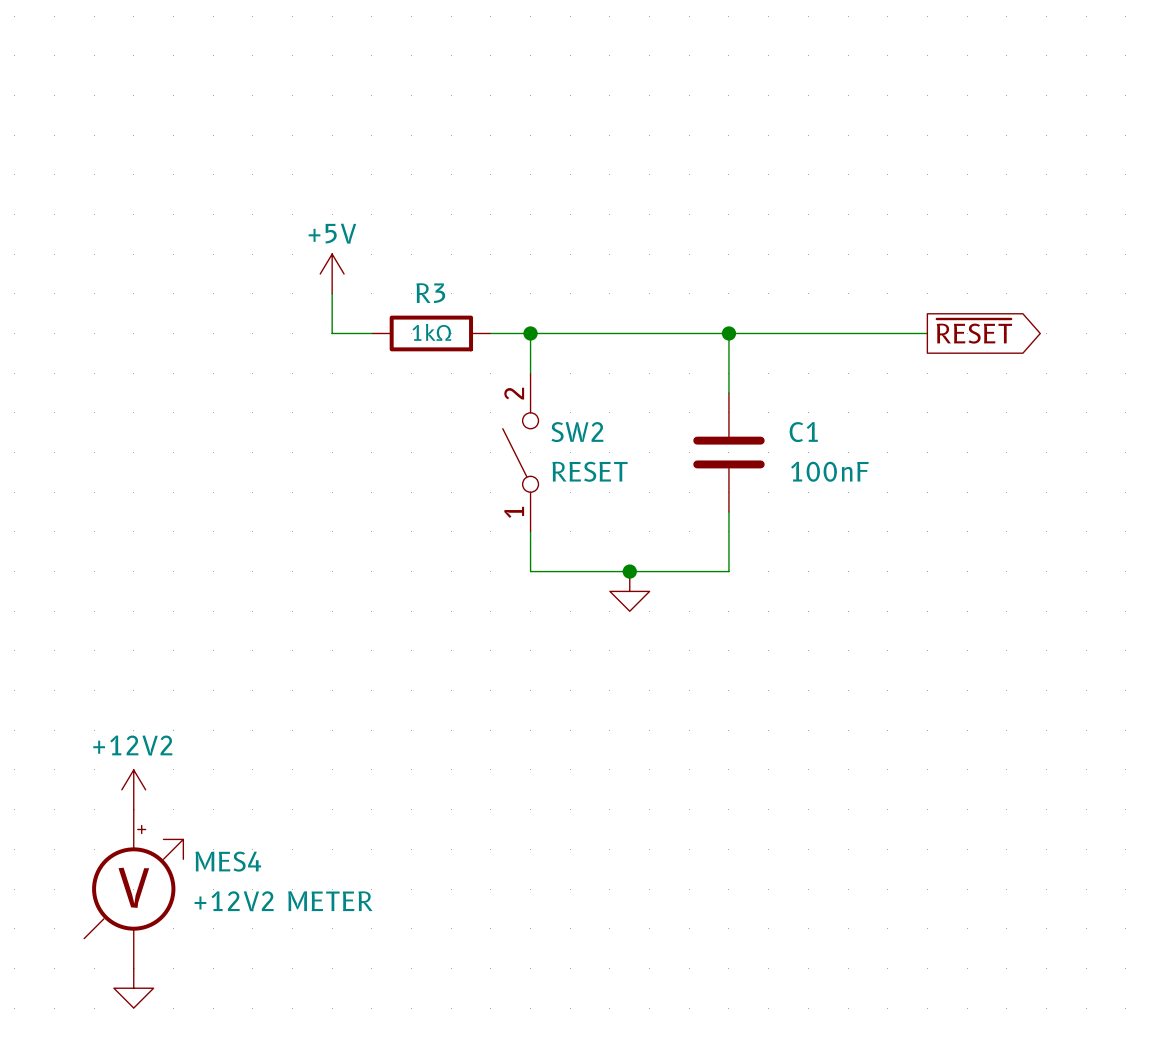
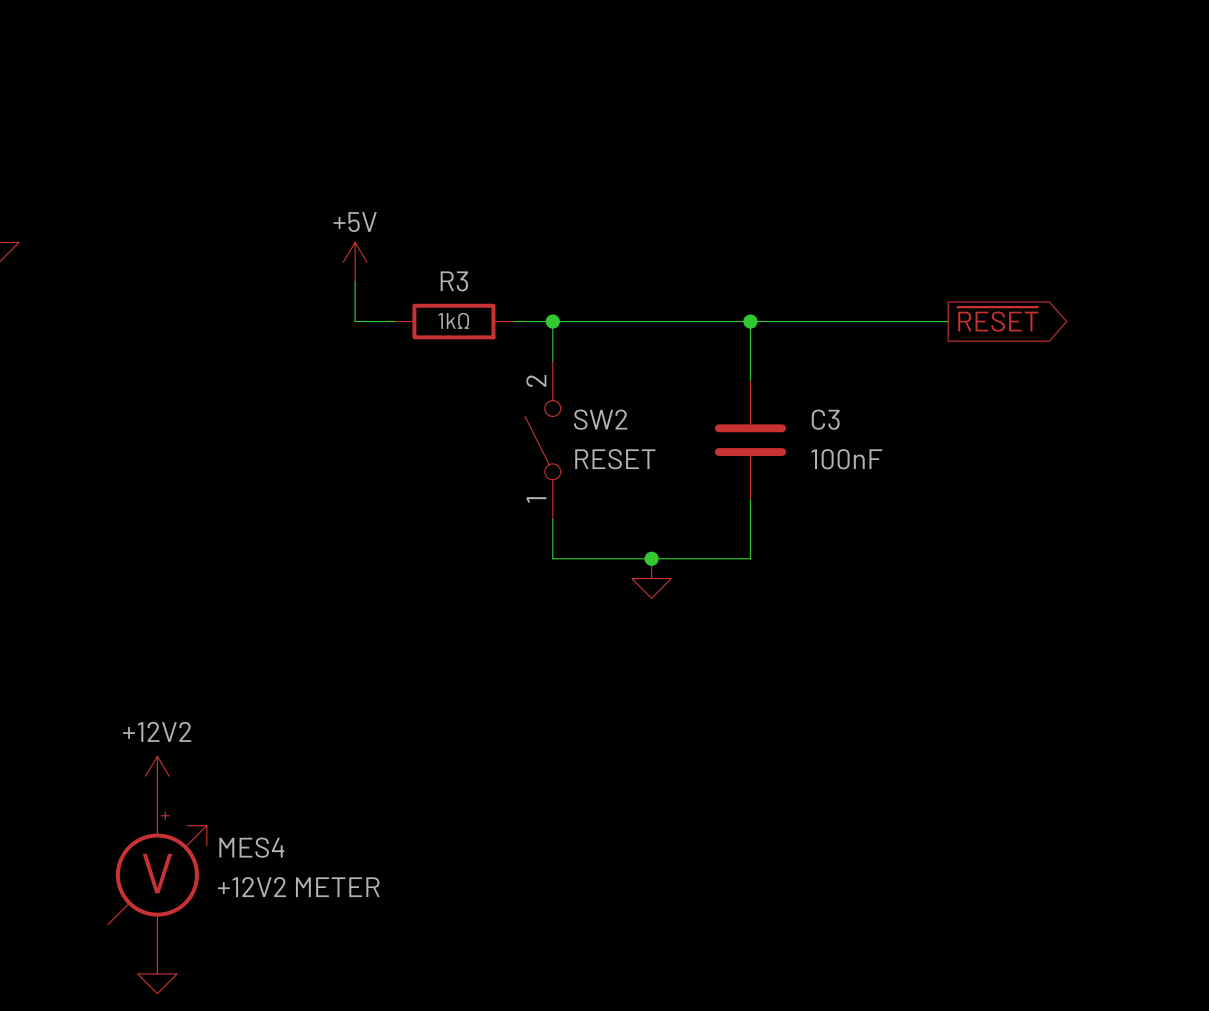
C1 name: C1 (803, 432) -> C3 (825, 419)

